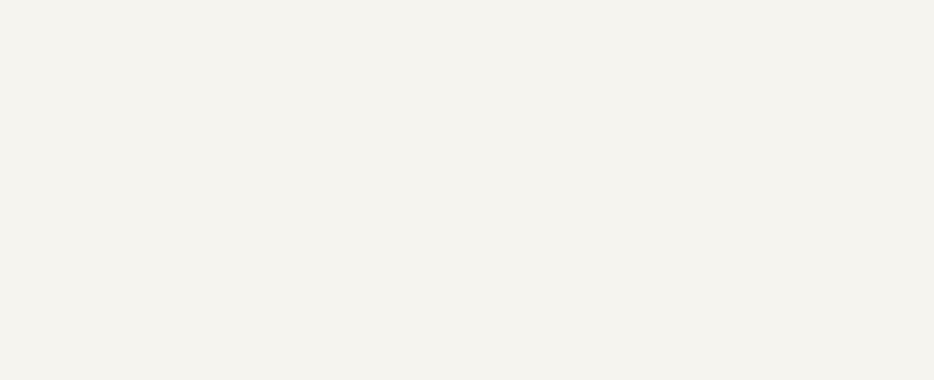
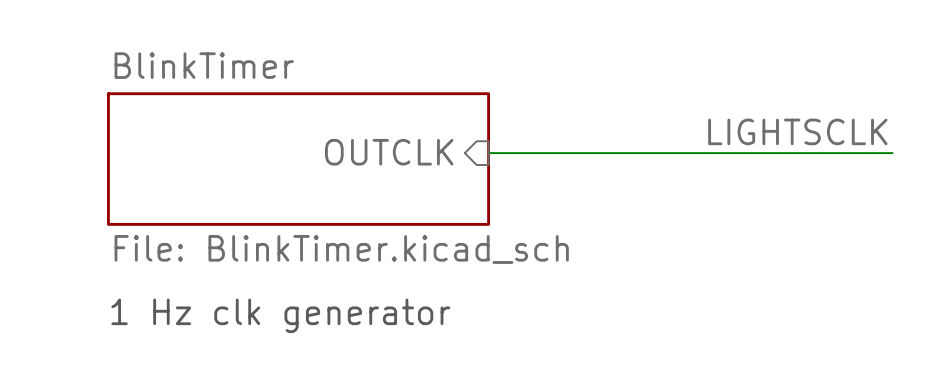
label: none -> LIGHTSCLK (797, 131)
sheet pin: none -> OUTCLK (389, 152)
wire: none -> (488, 153) (892, 153)
sheet BlinkTimer: none -> File: BlinkTimer.kicad_sch (298, 159)
text: none -> 1 Hz clk generator (280, 315)

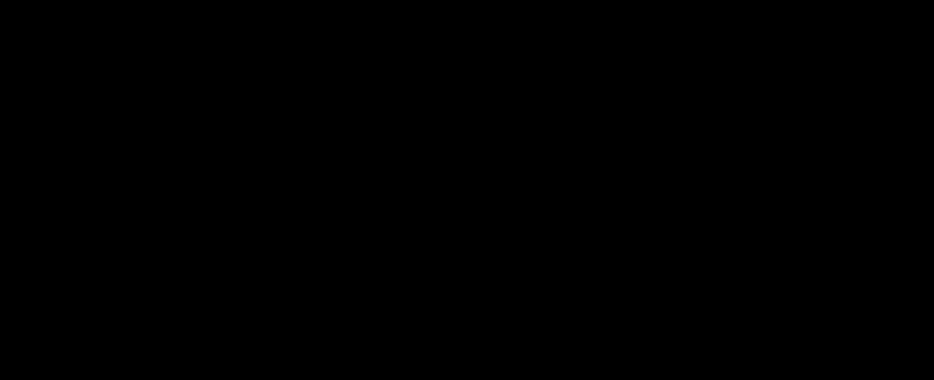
label: LIGHTSCLK (797, 131) -> none
sheet pin: OUTCLK (389, 152) -> none
wire: (488, 153) (892, 153) -> none
sheet BlinkTimer: File: BlinkTimer.kicad_sch (298, 159) -> none
text: 1 Hz clk generator (280, 315) -> none

